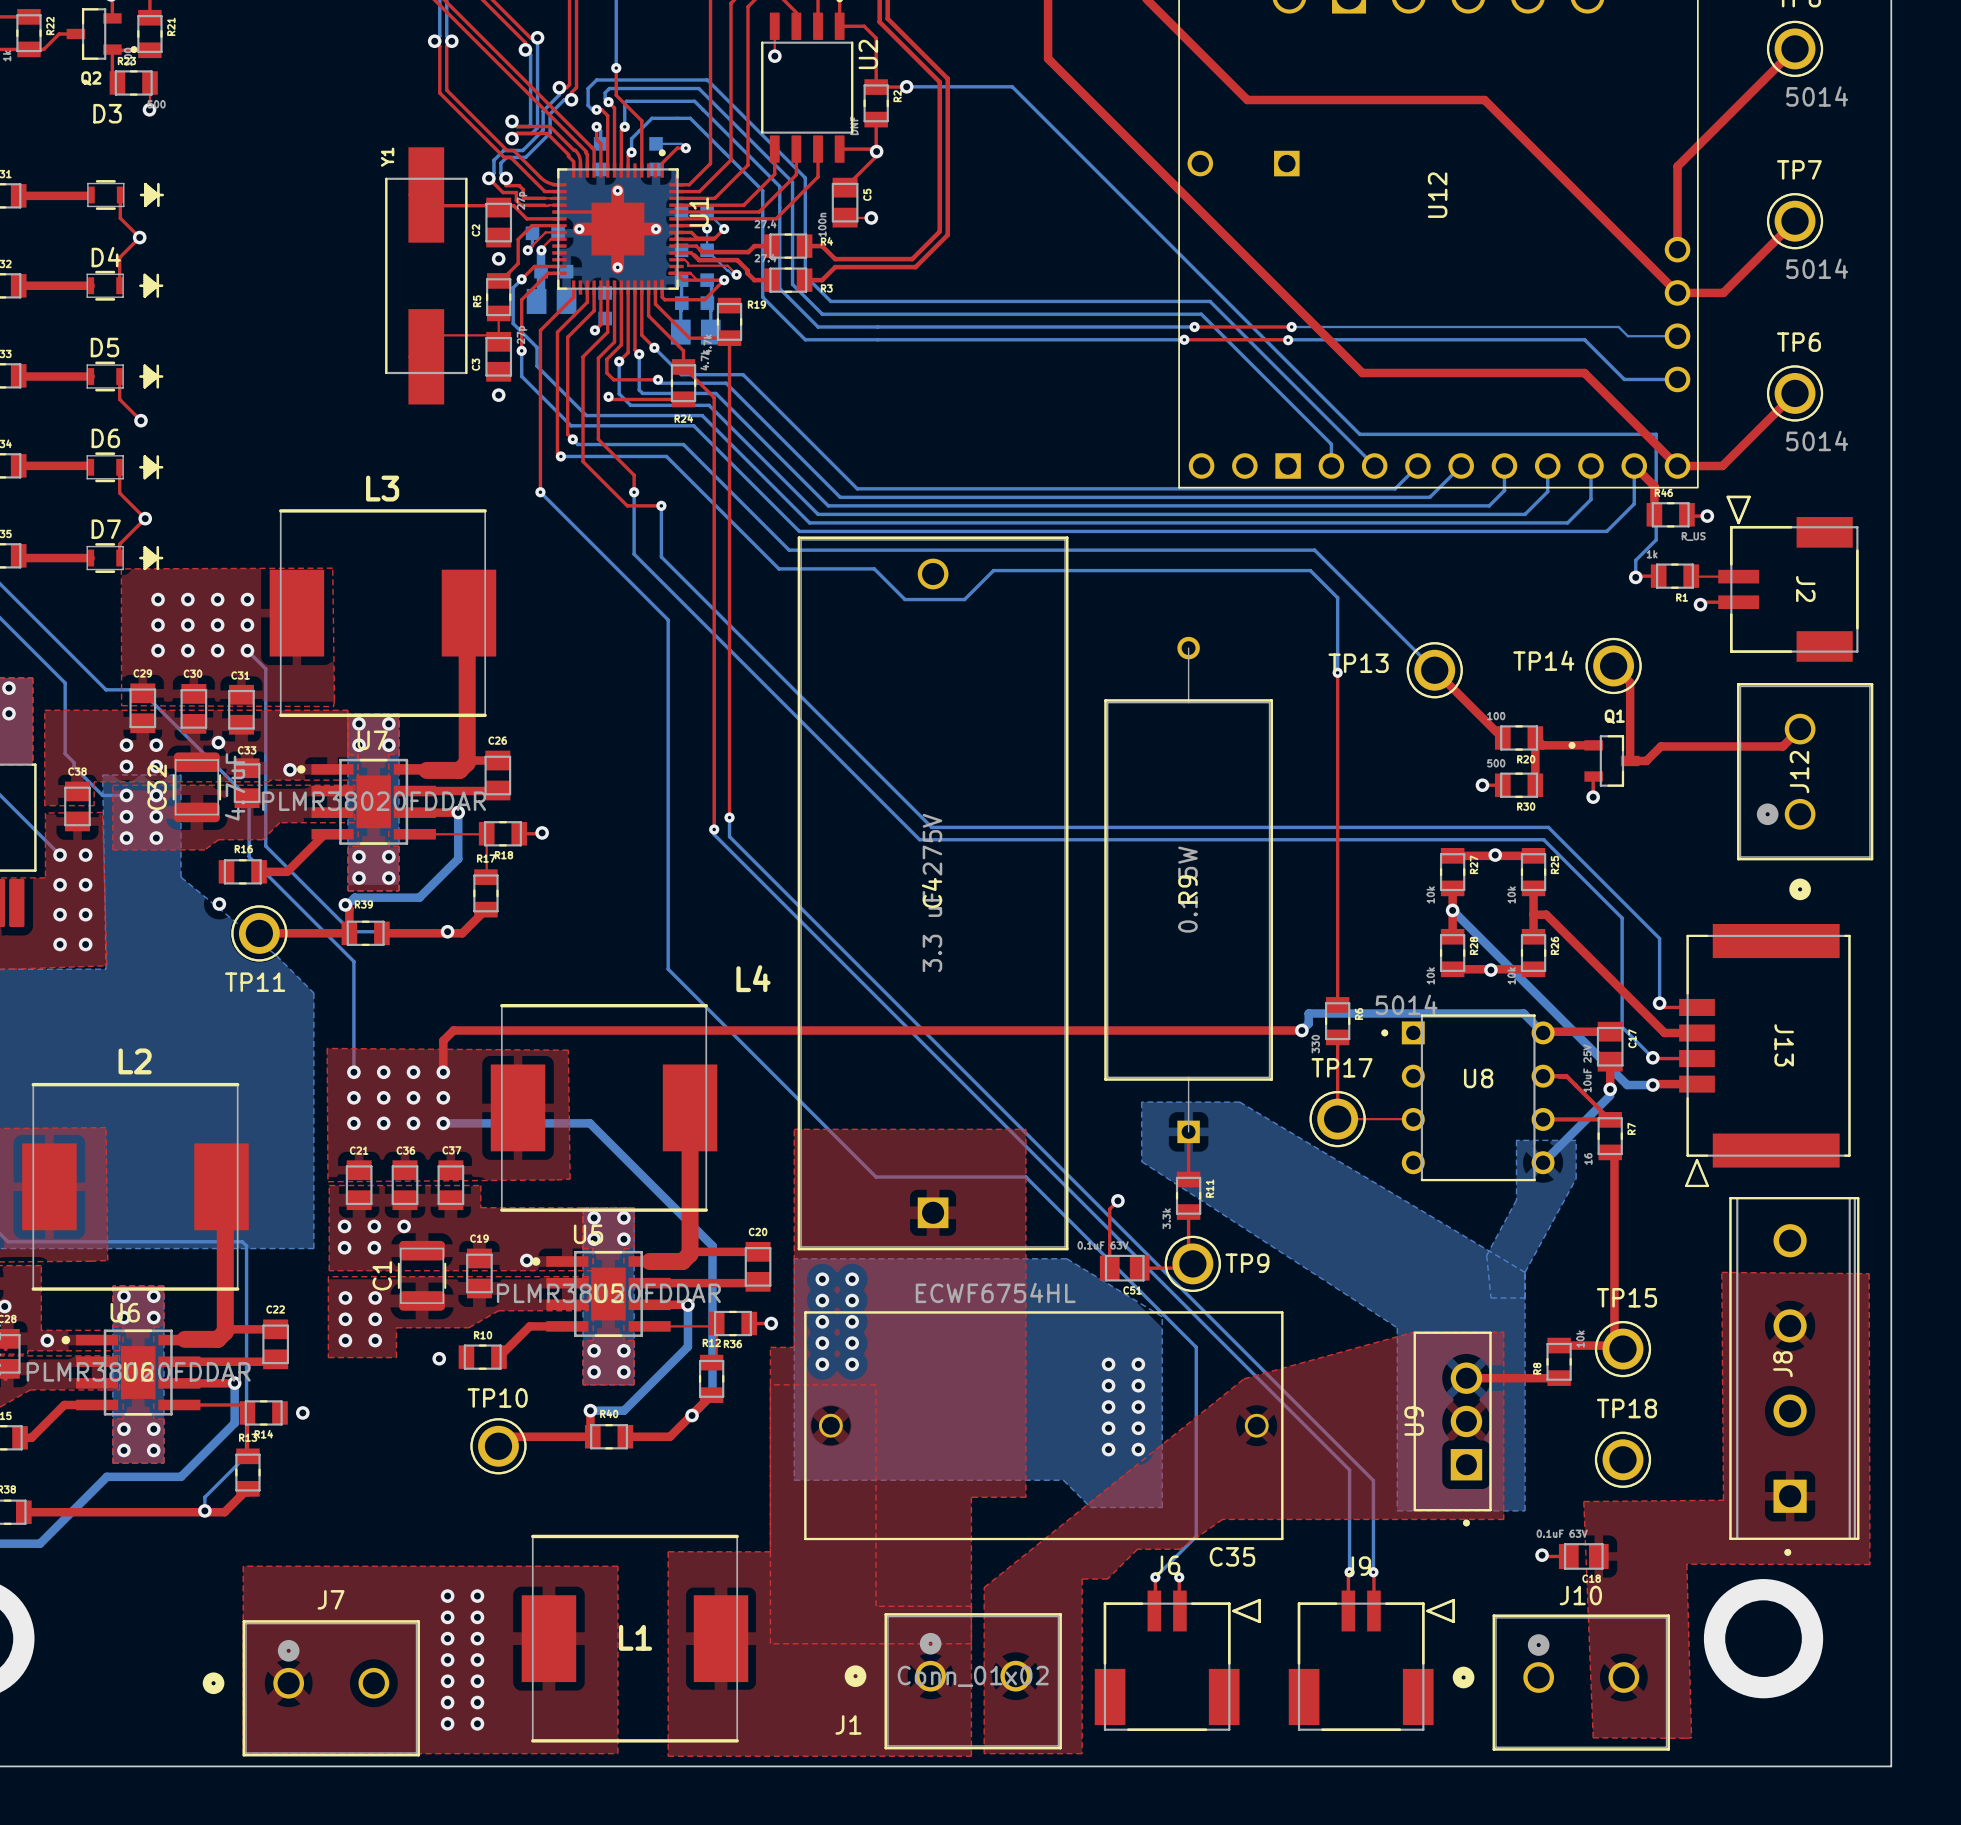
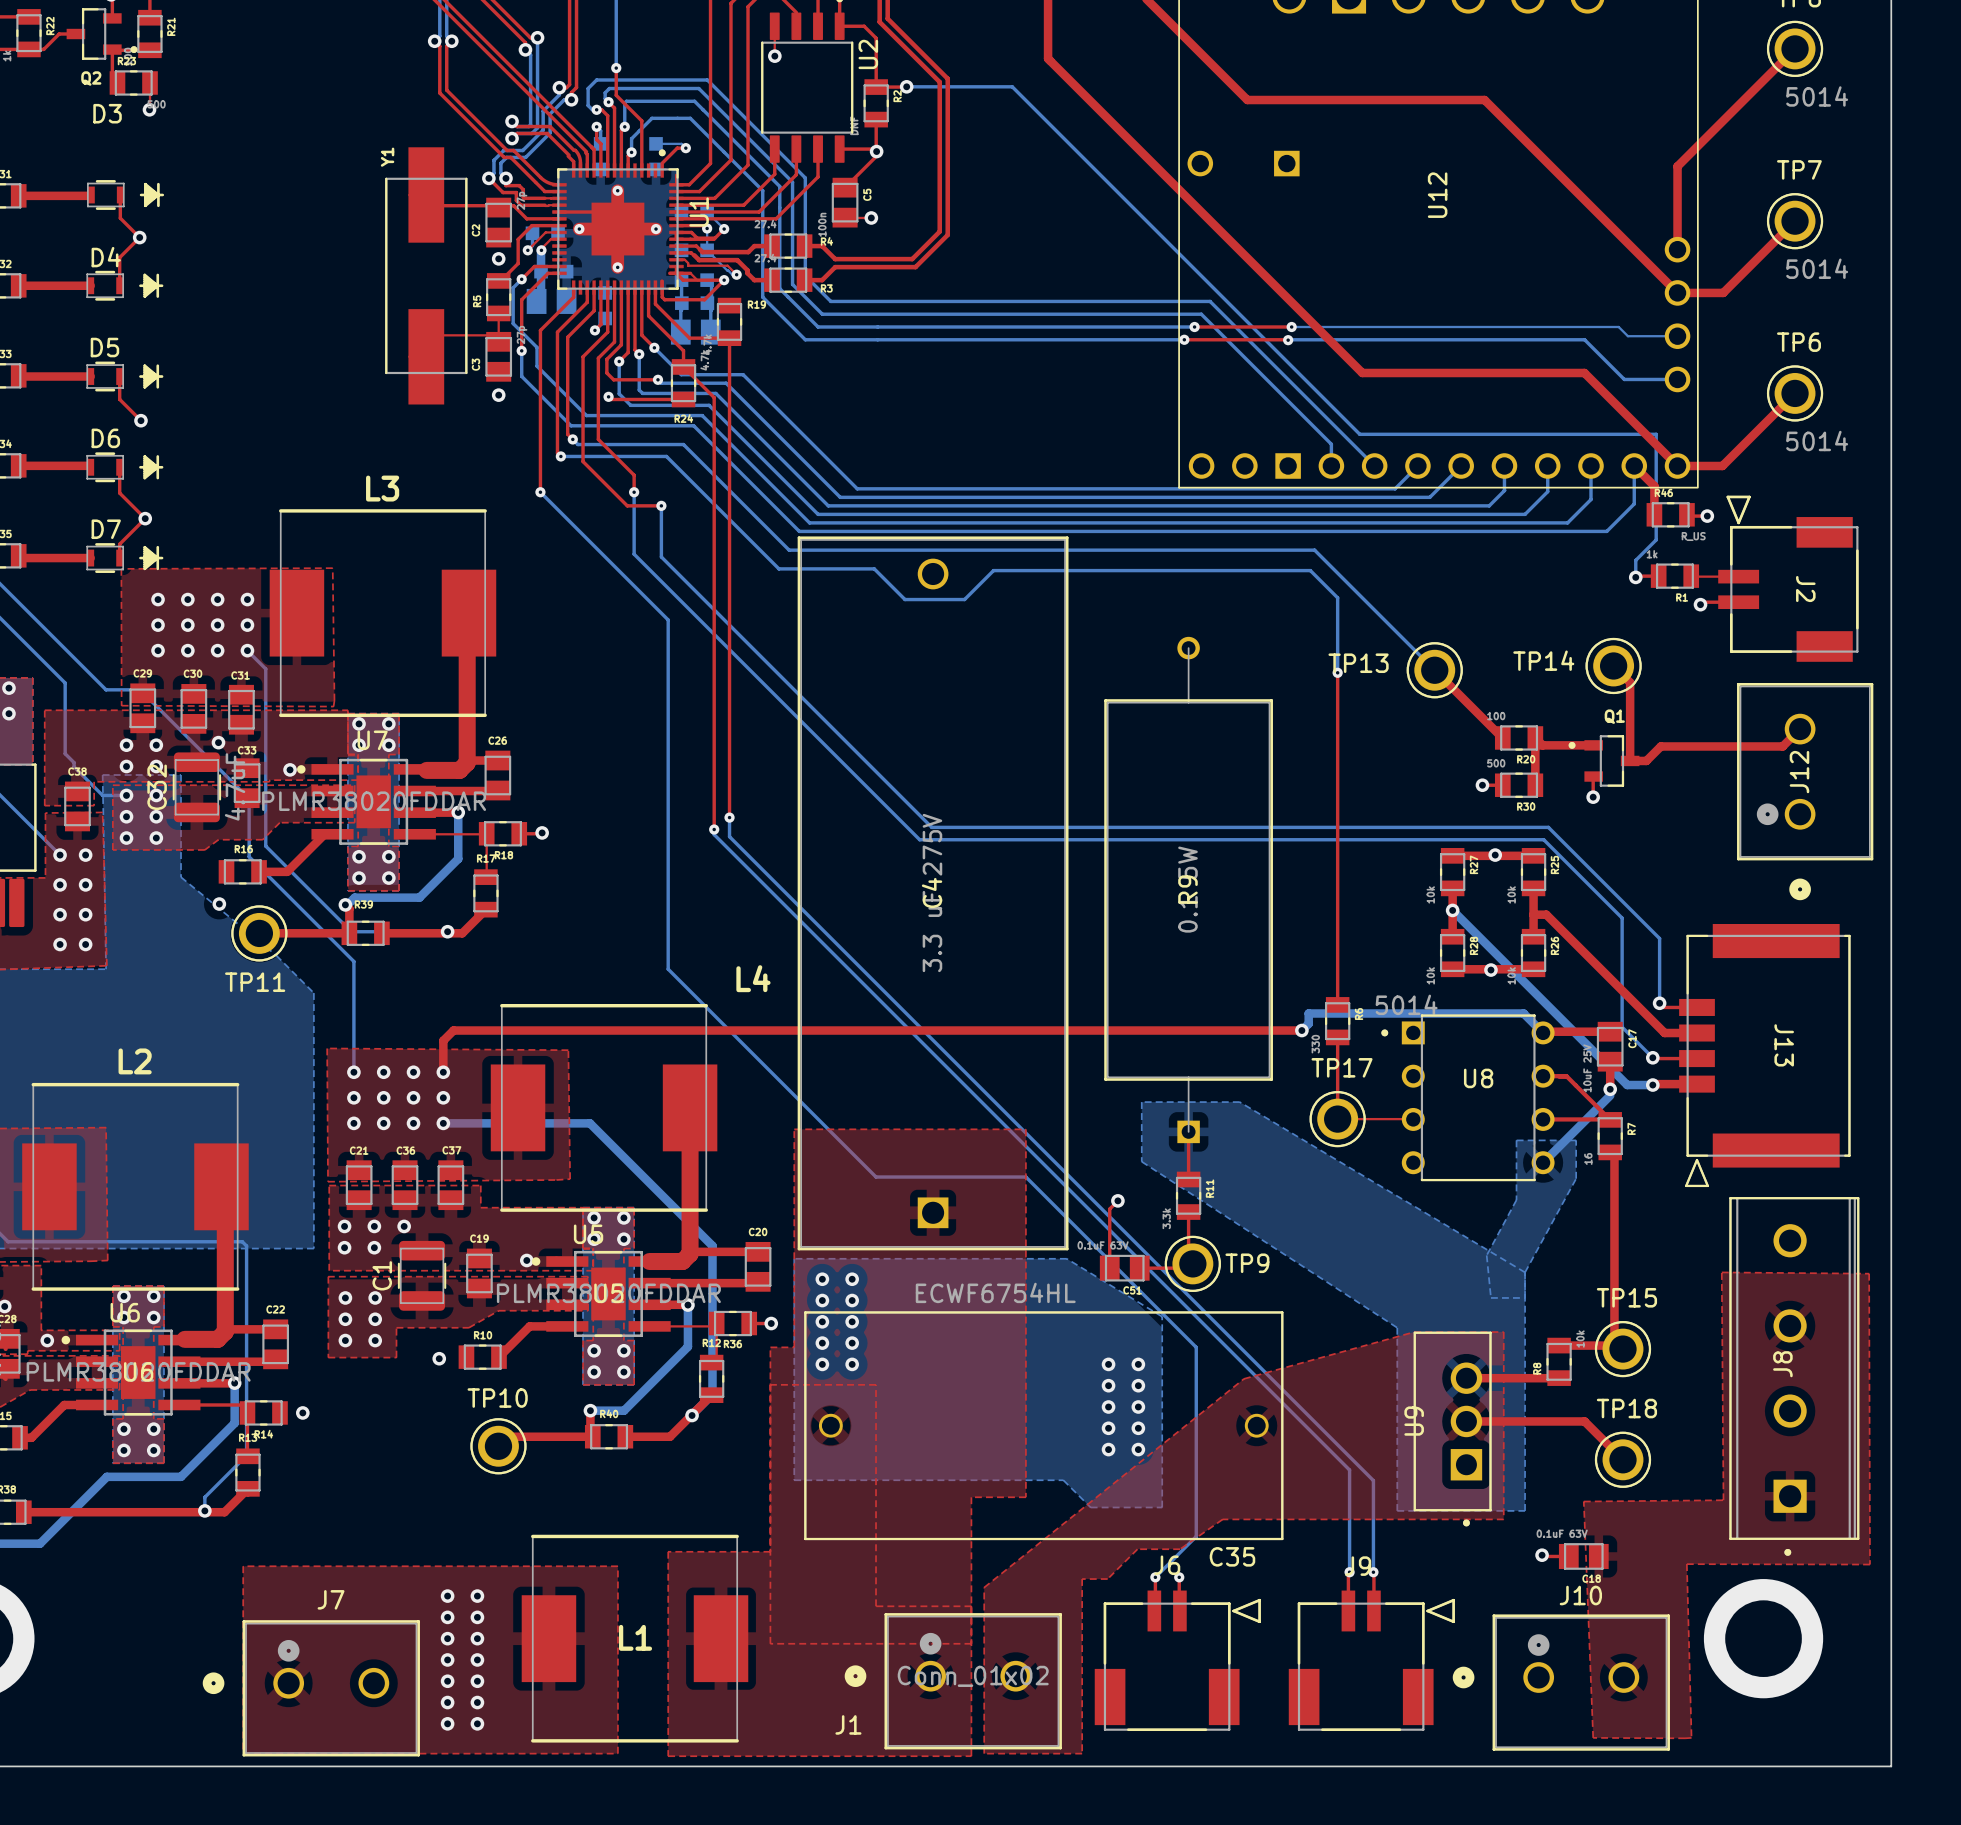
top track: none -> (1466, 1421) (1584, 1421) (1622, 1459)

